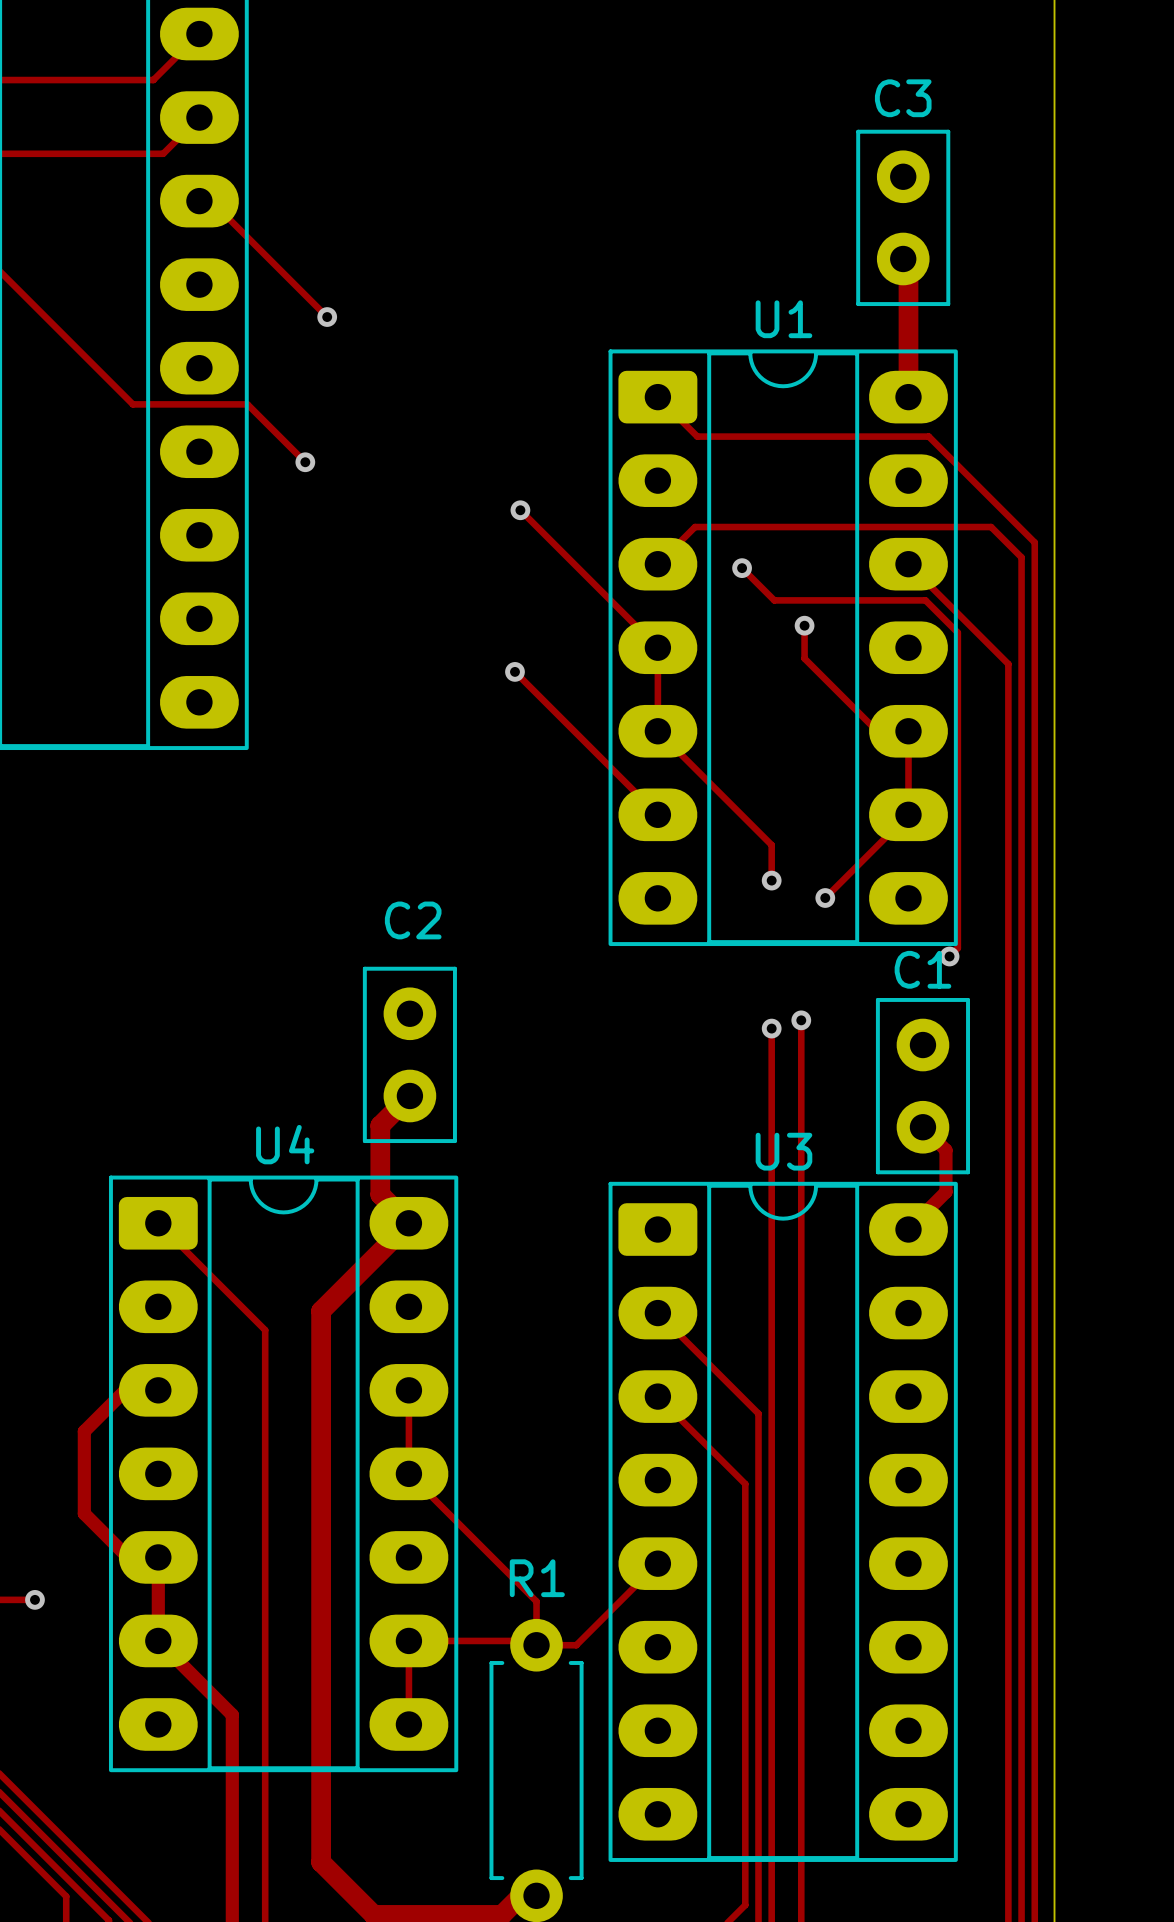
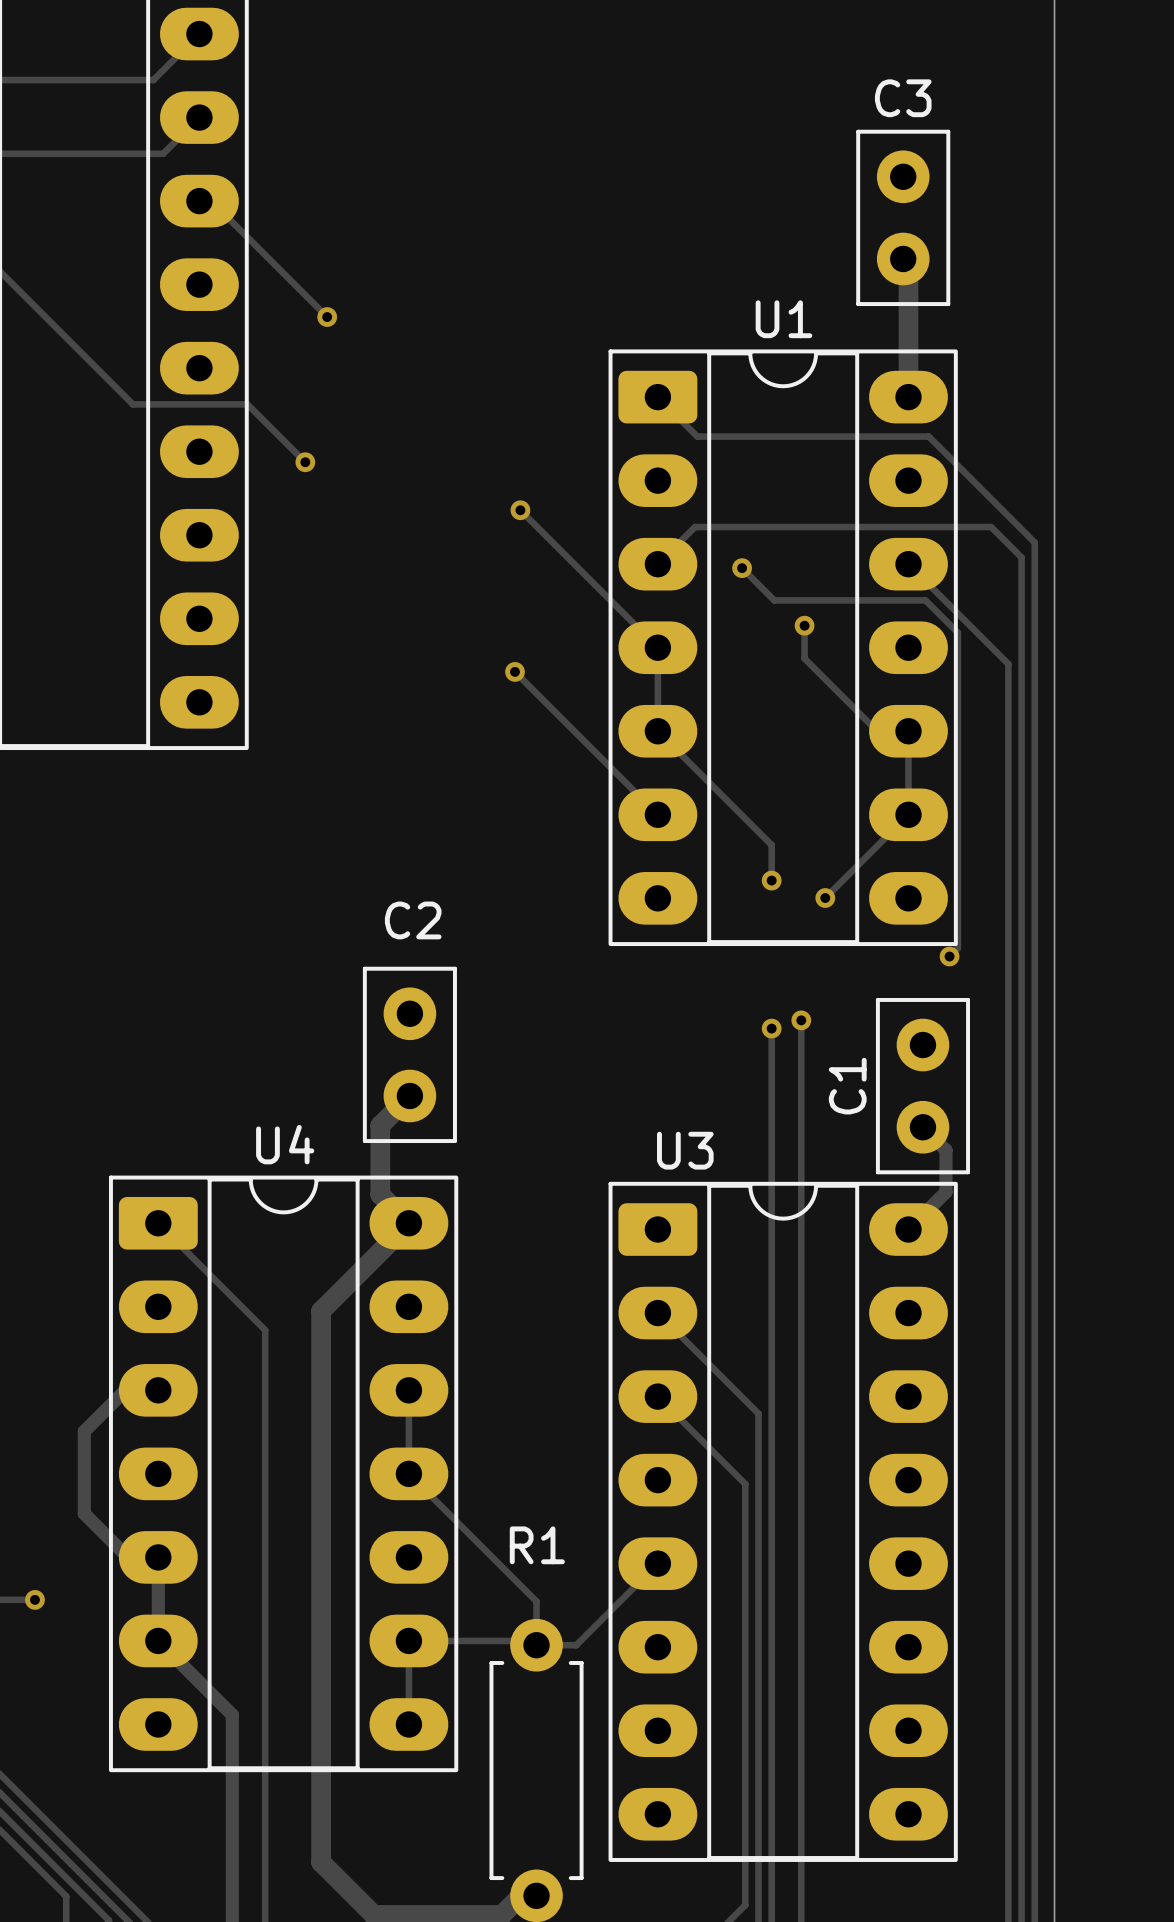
C1 name rotation: 0° (922, 969) -> 90° counterclockwise (847, 1086)
C1 name position: C1 (922, 969) -> C1 (847, 1086)
U3 name position: U3 (783, 1151) -> U3 (685, 1150)
R1 name position: R1 (537, 1578) -> R1 (537, 1545)

